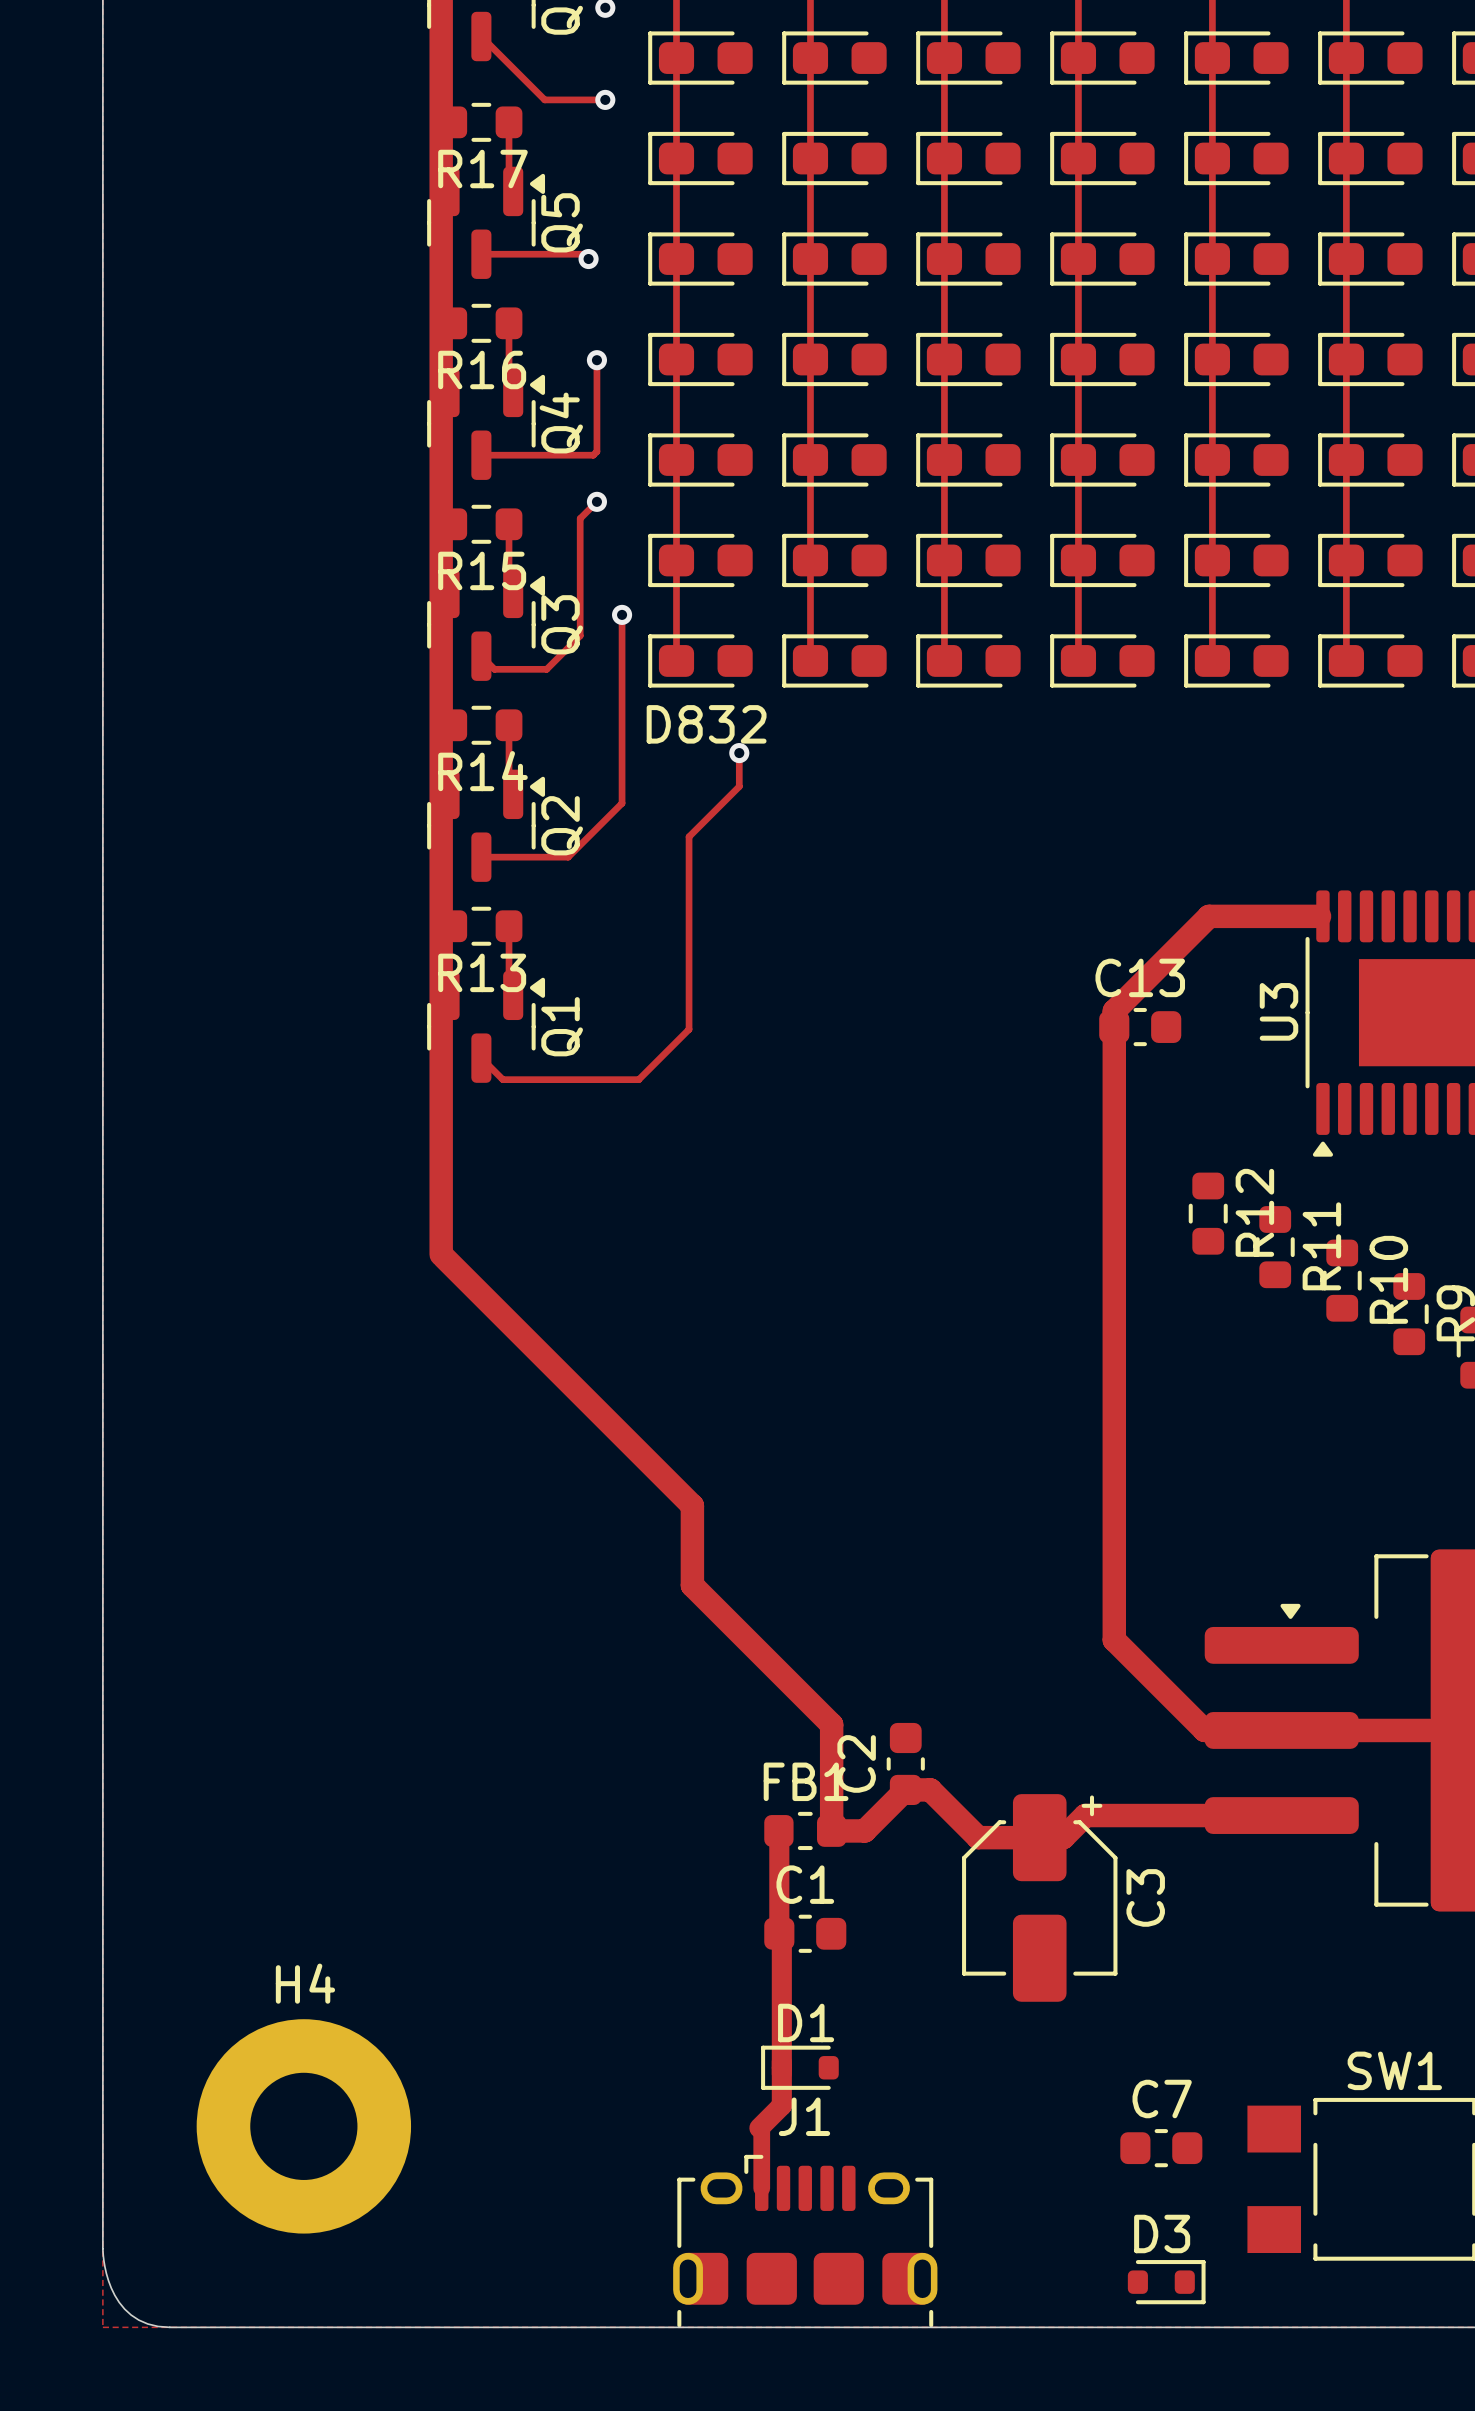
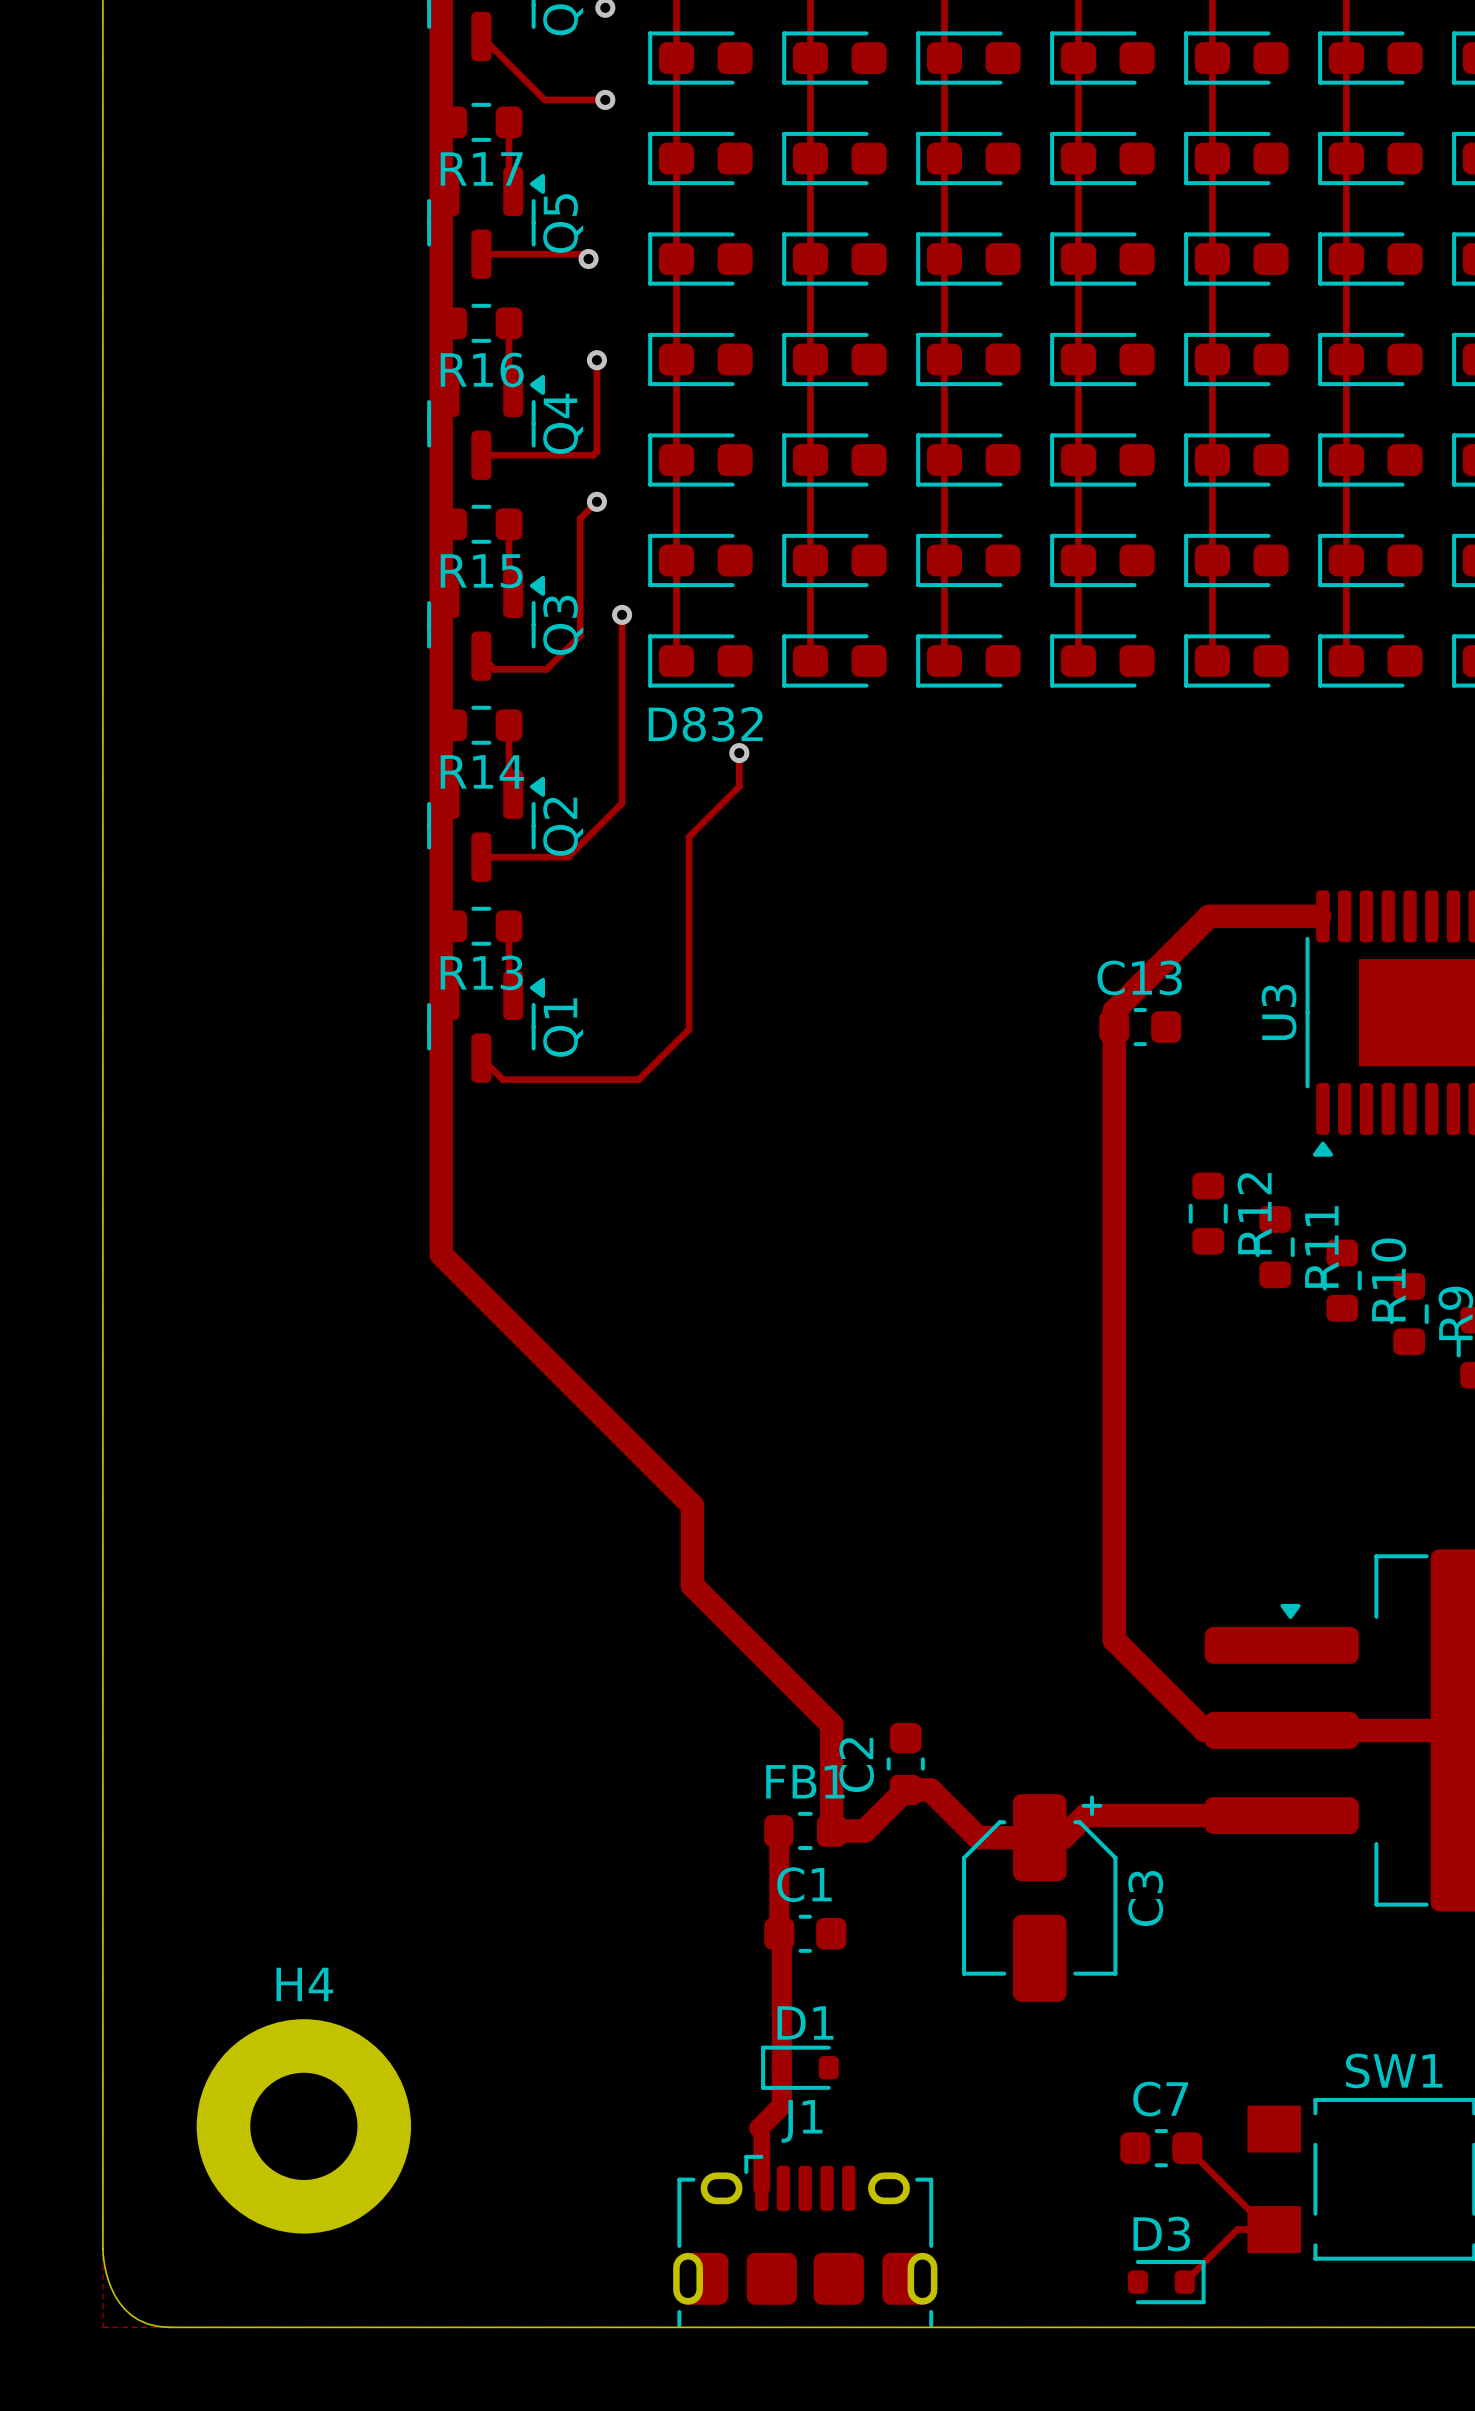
track: none -> (1187, 2148) (1268, 2229)
track: none -> (1274, 2229) (1237, 2229) (1184, 2282)

